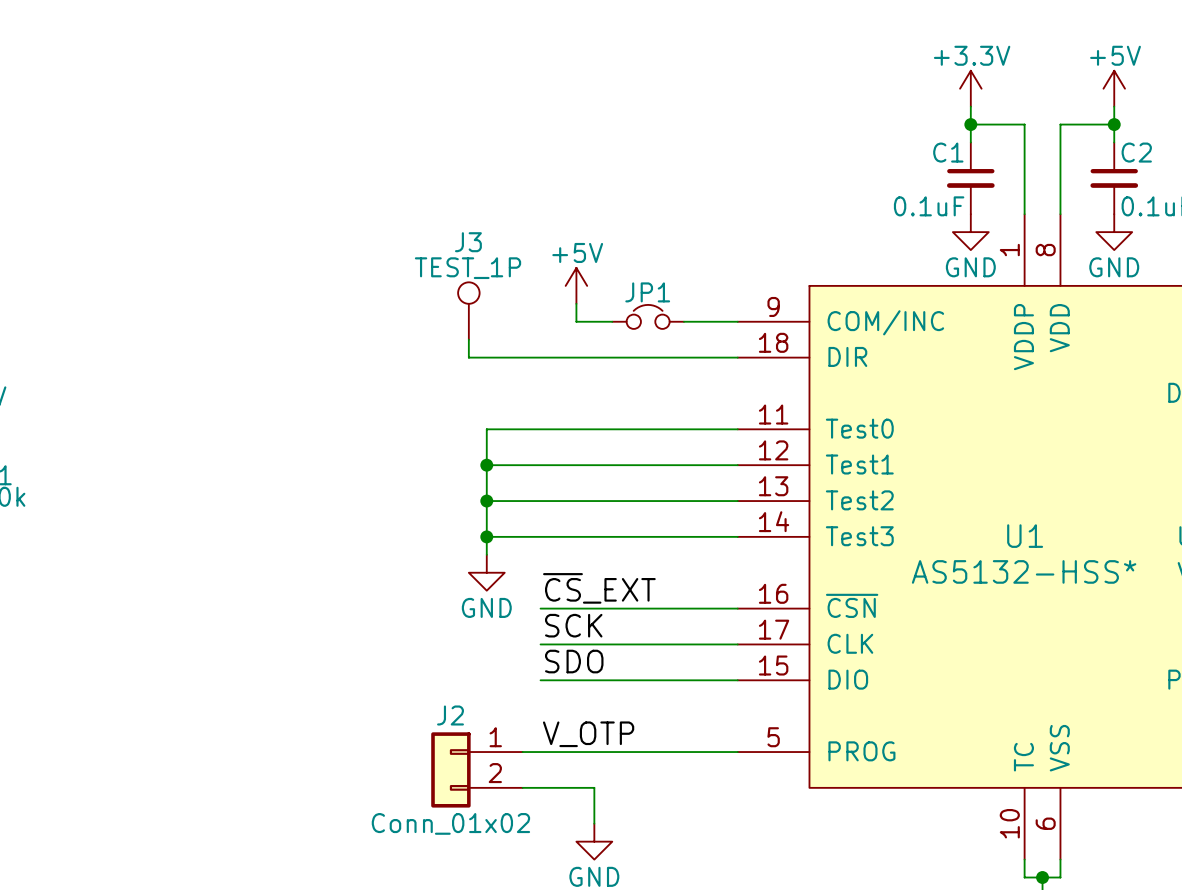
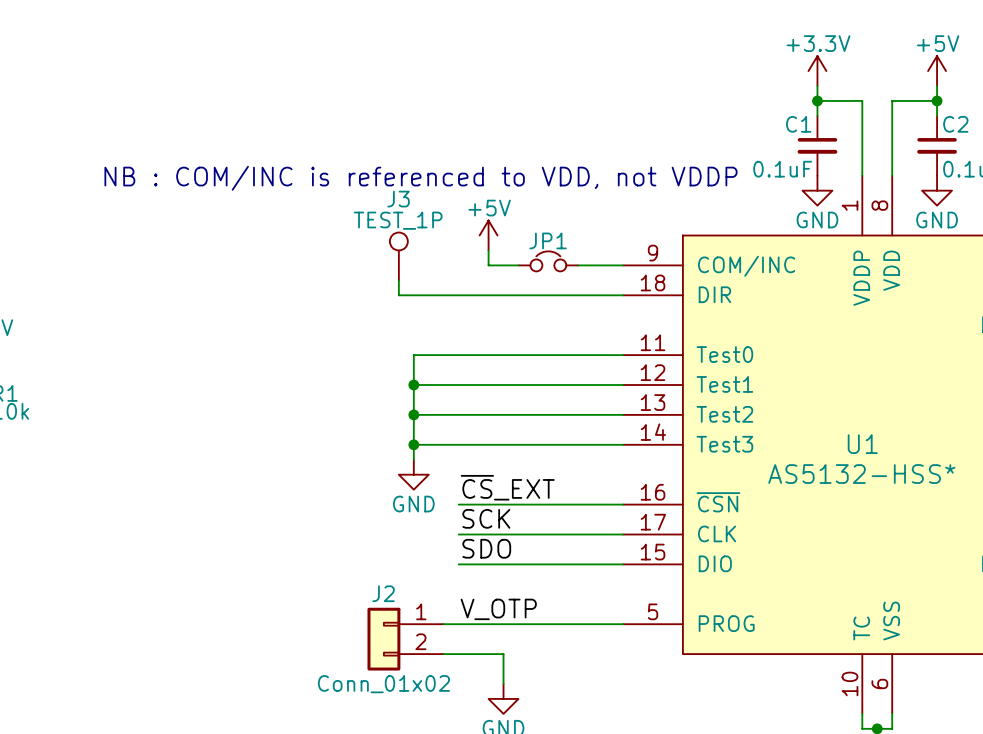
text: none -> NB : COM/INC is referenced to VDD, not VDDP (420, 178)

